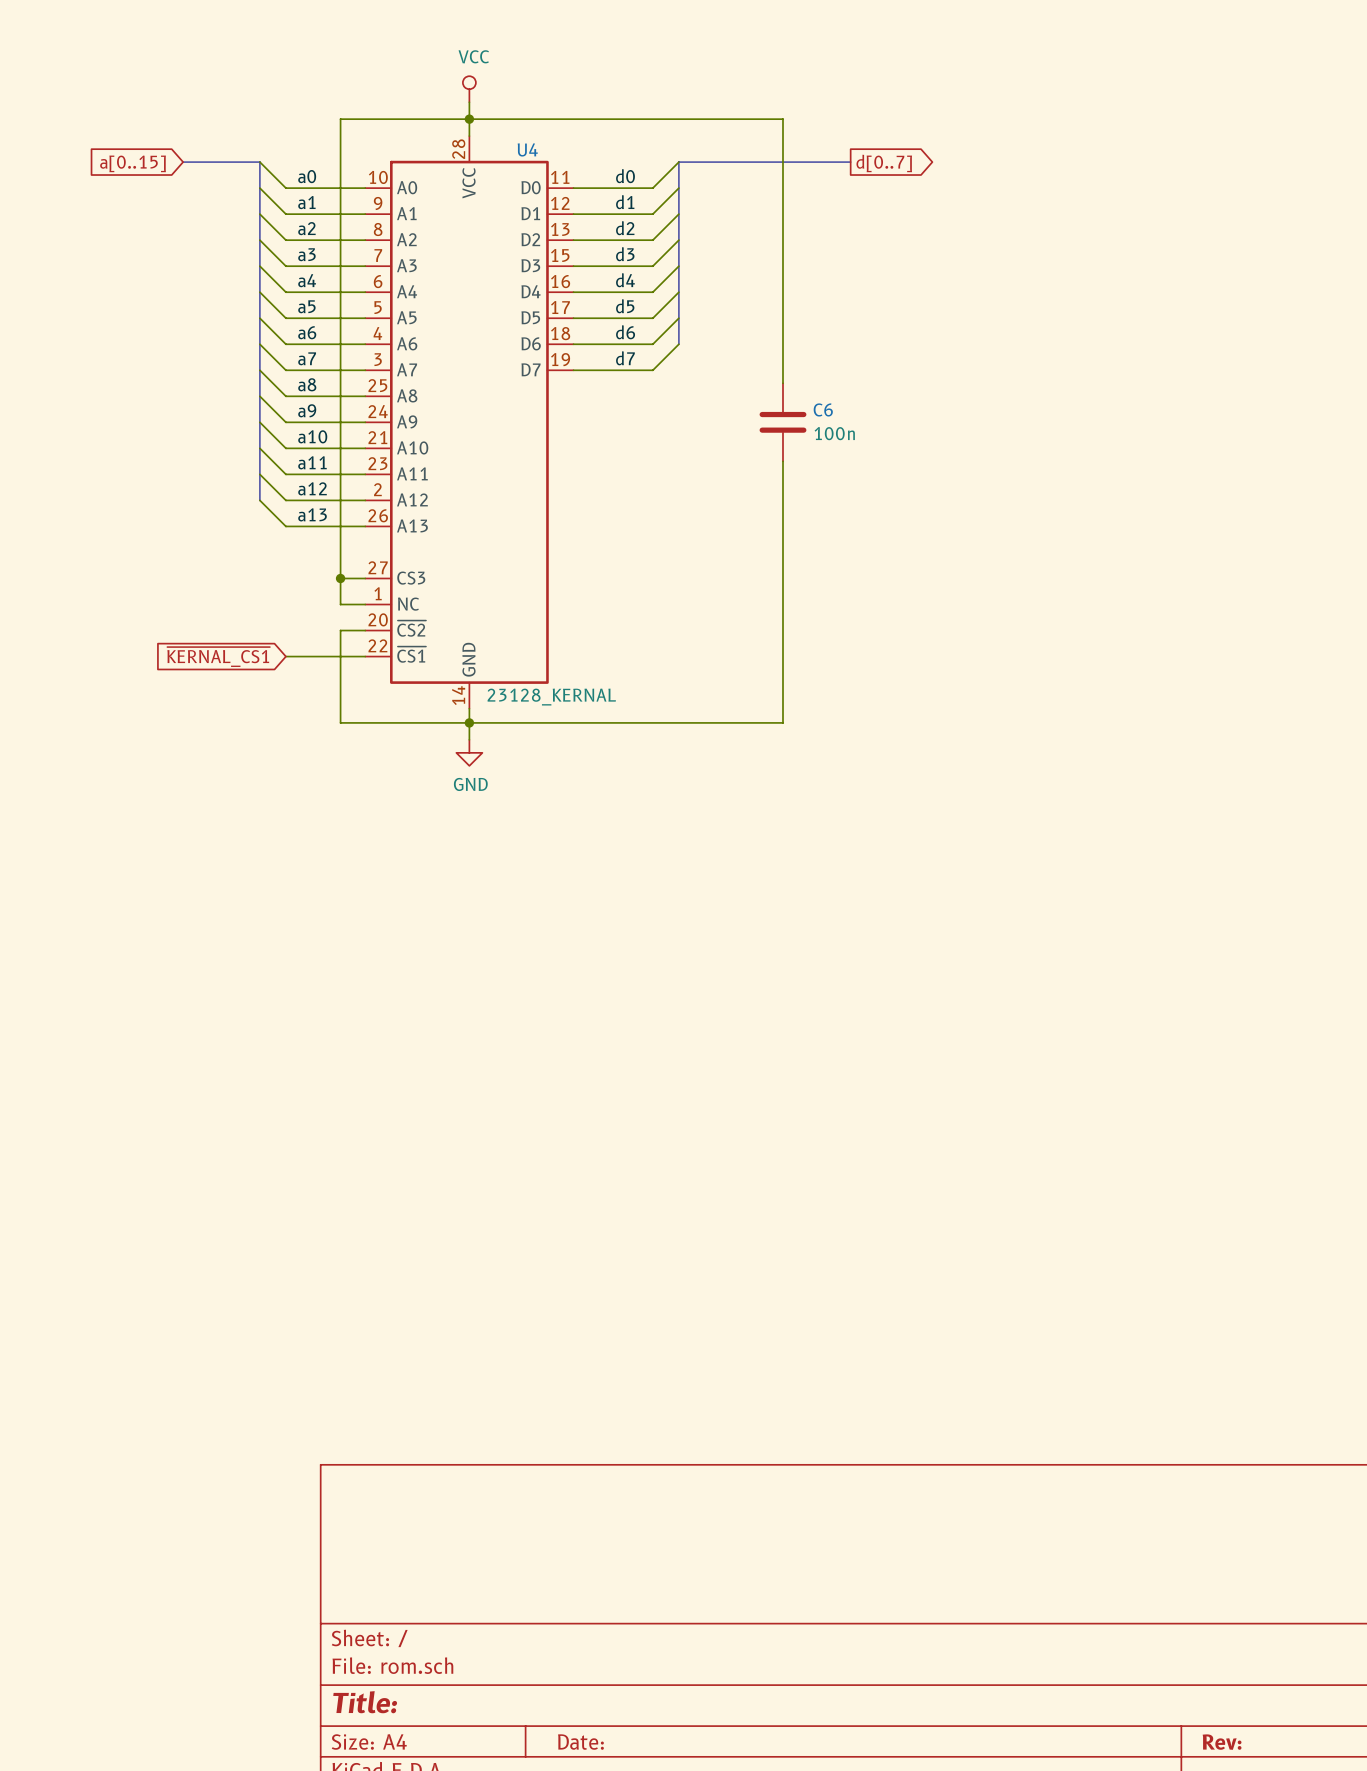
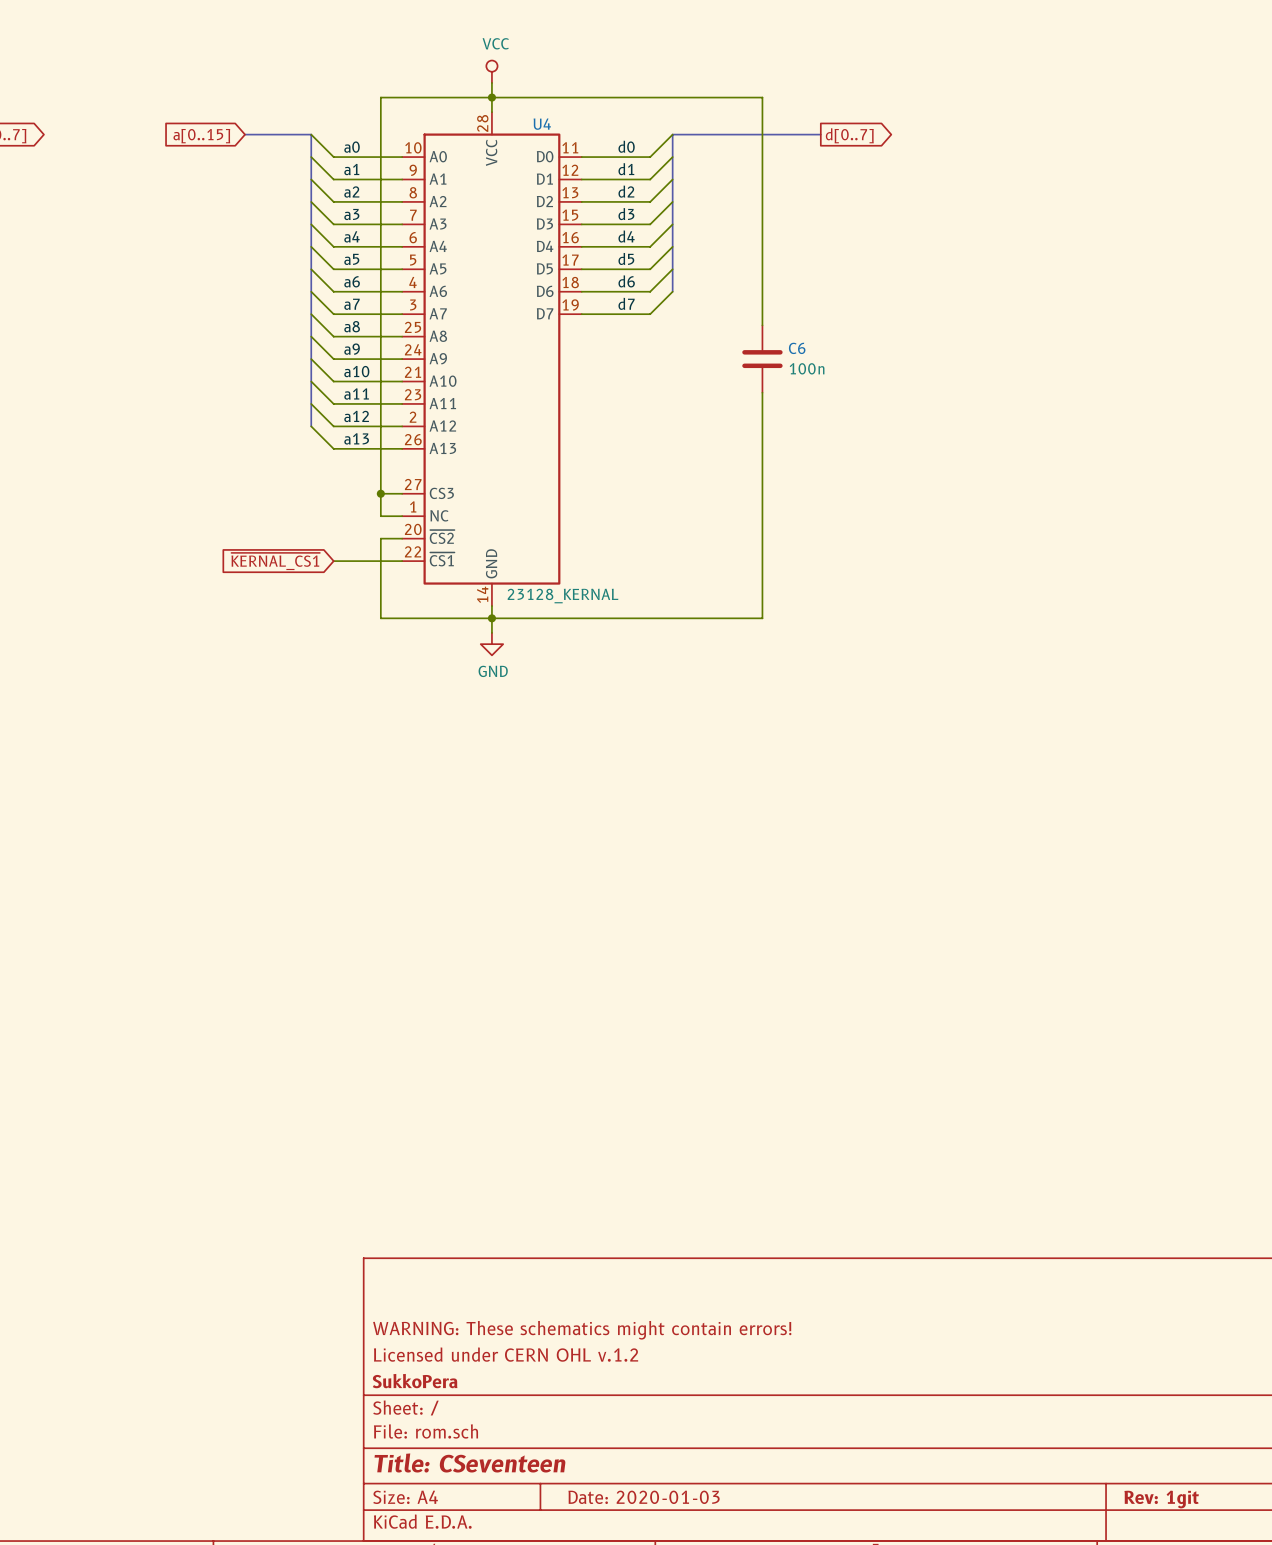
title block: none -> WARNING: These schematics might contain errors! (582, 1330)
title block: none -> Licensed under CERN OHL v.1.2 (506, 1354)
title block: none -> SukkoPera (415, 1381)
title block: Title: (365, 1702) -> Title: CSeventeen (469, 1463)
title block: Date: (580, 1742) -> Date: 2020-01-03 (644, 1497)
title block: Rev: (1222, 1742) -> Rev: 1git (1161, 1499)

